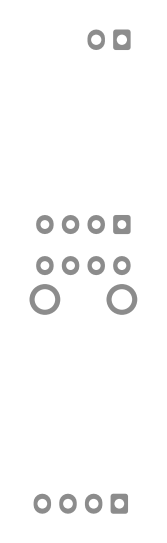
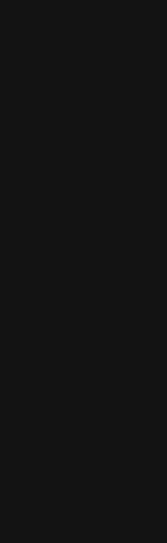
part: (109, 39) -> none
part: (83, 264) -> none
part: (80, 503) -> none

